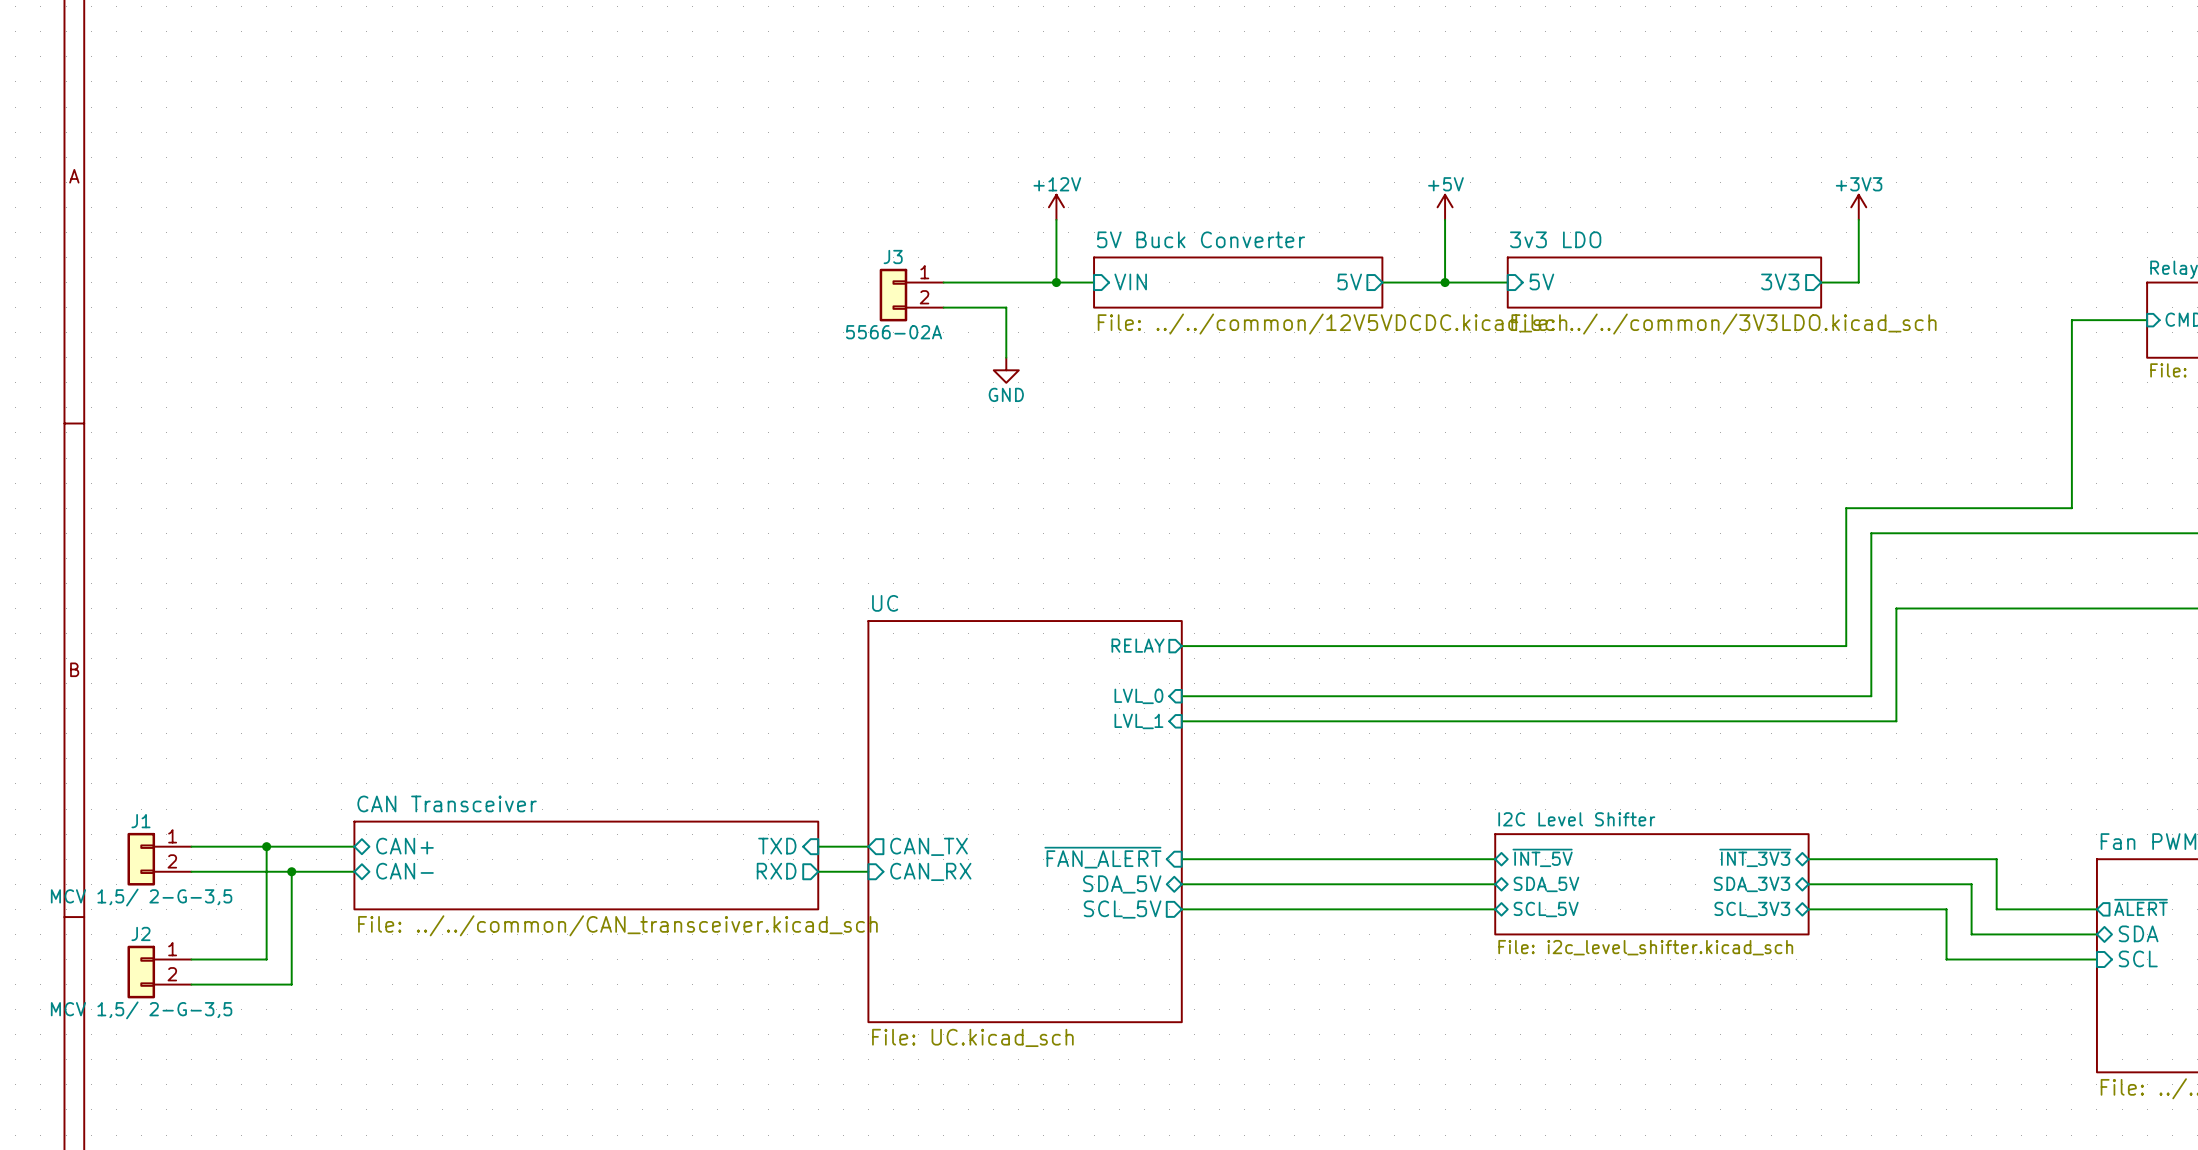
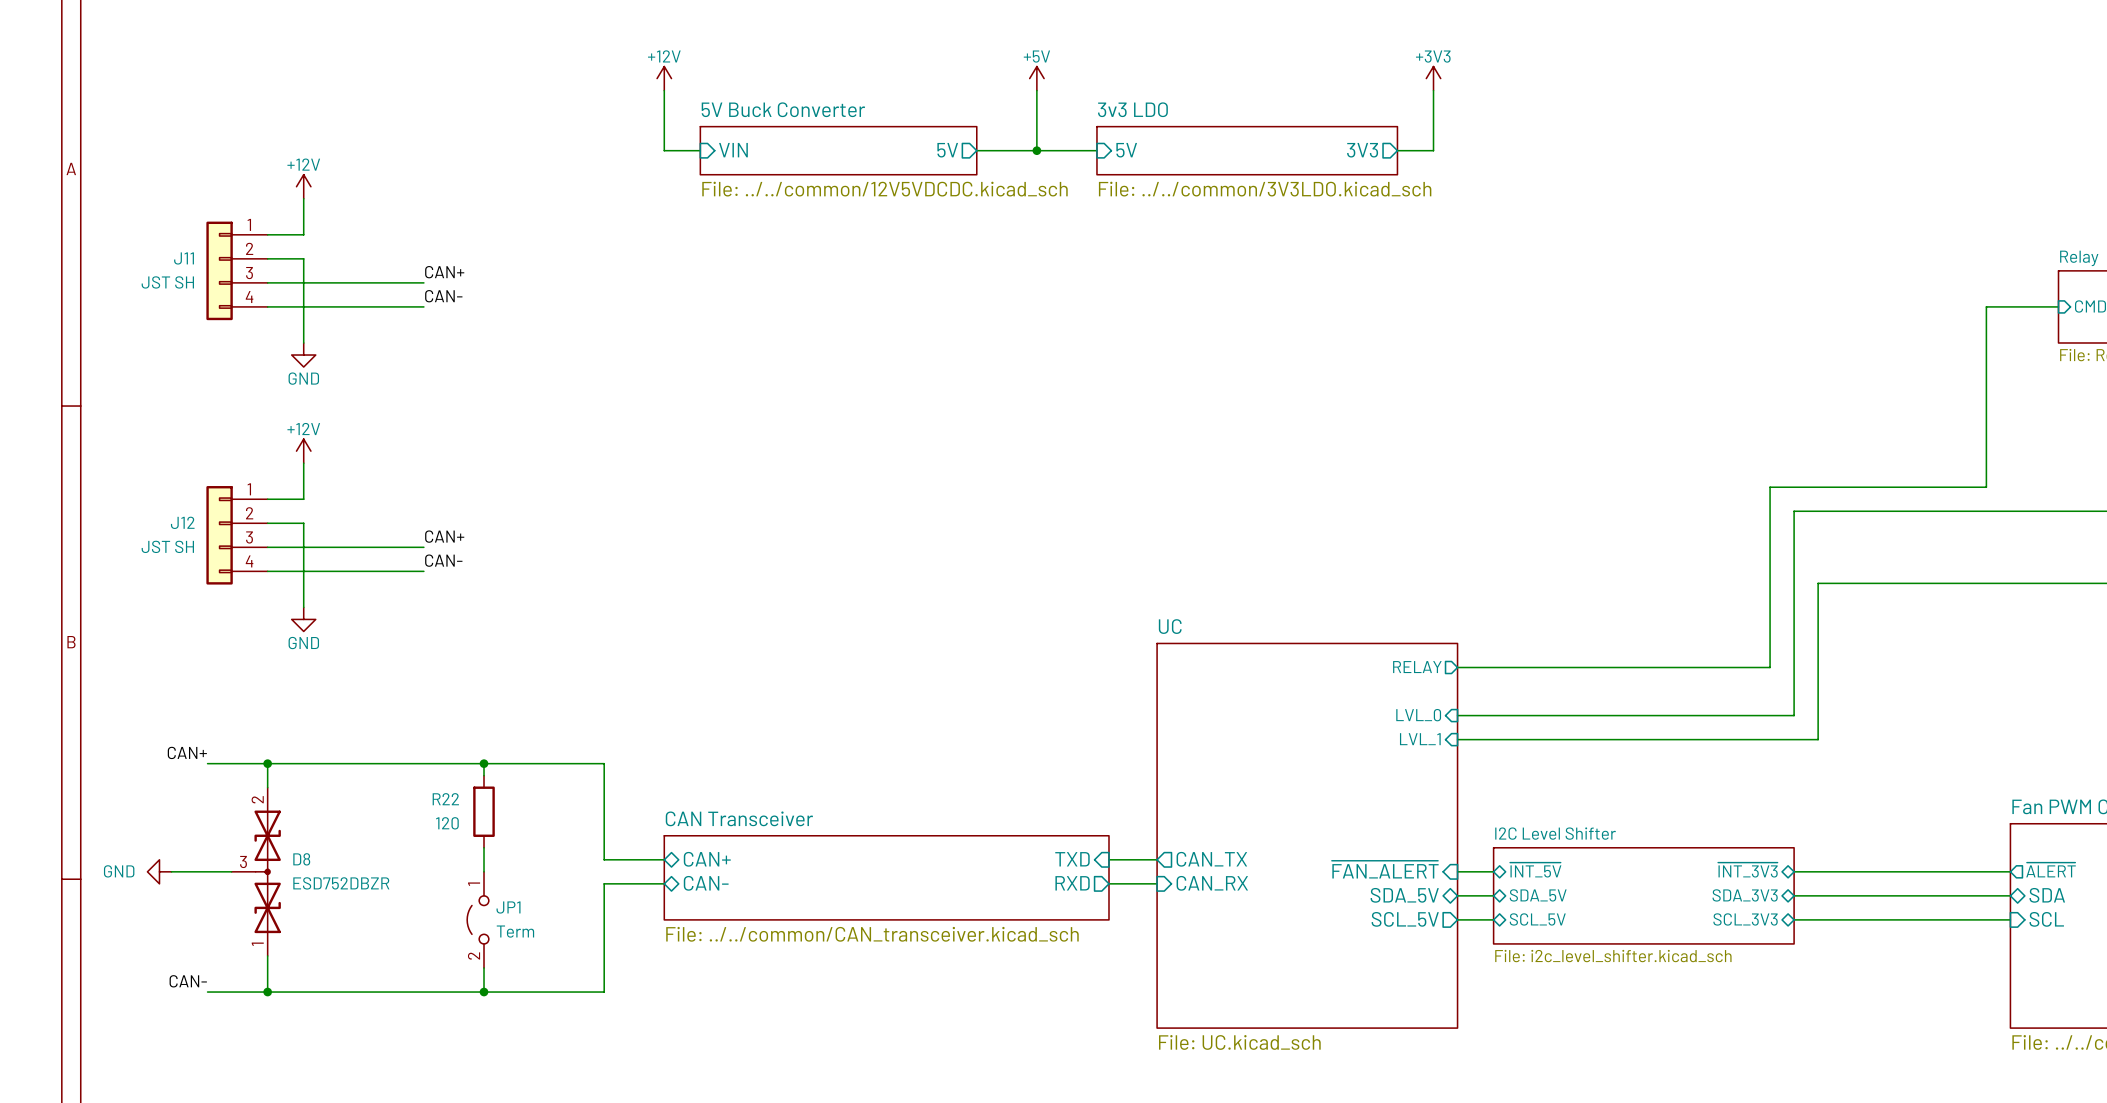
power symbol: none -> +12V (664, 78)
power symbol: none -> +5V (1036, 78)
power symbol: none -> +3V3 (1433, 78)
wire: none -> (664, 90) (664, 150) (700, 150)
wire: none -> (1433, 90) (1433, 150) (1397, 150)
sheet pin: none -> VIN (733, 150)
sheet pin: none -> 5V (947, 150)
sheet pin: none -> 5V (1126, 150)
sheet pin: none -> 3V3 (1362, 150)
wire: none -> (976, 150) (1096, 150)
junction: none -> (1036, 150)
power symbol: none -> +12V (303, 186)
wire: none -> (303, 198) (303, 234) (267, 234)
power symbol: +12V (1056, 207) -> none
power symbol: +5V (1445, 207) -> none
power symbol: +3V3 (1858, 207) -> none
wire: (1056, 219) (1056, 282) -> (1036, 90) (1036, 150)
wire: (1445, 219) (1445, 282) -> none
wire: (1858, 219) (1858, 282) (1821, 282) -> none
wire: none -> (267, 258) (303, 258) (303, 342)
sheet pin: VIN (1130, 281) -> none
sheet pin: 5V (1349, 281) -> none
sheet pin: 5V (1541, 281) -> none
sheet pin: 3V3 (1780, 281) -> none
J11: none -> JST SH (237, 270)
wire: (943, 282) (1094, 282) -> none
junction: (1056, 282) -> none
sheet 5V Buck Converter position: (1238, 282) -> (838, 150)
wire: (1382, 282) (1507, 282) -> none
junction: (1445, 282) -> none
sheet 3v3 LDO position: (1664, 282) -> (1247, 150)
label: none -> CAN+ (444, 272)
wire: none -> (267, 282) (423, 282)
J3: 5566-02A (911, 295) -> none
wire: (943, 307) (1006, 307) (1006, 357) -> none
label: none -> CAN- (443, 296)
wire: none -> (267, 306) (423, 306)
power symbol: none -> GND (303, 355)
power symbol: GND (1006, 370) -> none
power symbol: none -> +12V (303, 451)
wire: none -> (303, 463) (303, 499) (267, 499)
wire: none -> (267, 523) (303, 523) (303, 607)
J12: none -> JST SH (237, 535)
label: none -> CAN+ (444, 536)
wire: none -> (267, 547) (423, 547)
label: none -> CAN- (443, 560)
wire: none -> (267, 571) (423, 571)
sheet pin: RELAY (1138, 645) -> none
power symbol: none -> GND (303, 619)
wire: (1181, 646) (1846, 646) -> none
sheet pin: none -> RELAY (1417, 667)
sheet pin: LVL_0 (1138, 696) -> none
wire: (1181, 696) (1520, 696) -> none
wire: (1846, 696) (1871, 696) -> (1770, 667) (1770, 619)
wire: none -> (1794, 667) (1794, 715) (1457, 715)
sheet pin: LVL_1 (1138, 721) -> none
wire: (1181, 721) (1896, 721) -> (1457, 739) (1818, 739) (1818, 691)
sheet pin: none -> LVL_0 (1418, 715)
sheet pin: none -> LVL_1 (1420, 739)
label: none -> CAN+ (187, 752)
wire: none -> (207, 763) (604, 763) (604, 859) (664, 859)
wire: none -> (267, 763) (267, 787)
junction: none -> (267, 763)
junction: none -> (484, 763)
sheet UC: File: UC.kicad_sch (1025, 821) -> none
wire: (191, 846) (354, 846) -> none
wire: (266, 846) (266, 959) (191, 959) -> none
junction: (266, 846) -> none
sheet pin: CAN+ (404, 846) -> none
R22: none -> 120 (484, 811)
sheet pin: TXD (777, 846) -> none
wire: (818, 846) (868, 846) -> none
sheet pin: CAN_TX (929, 846) -> none
sheet pin: ~{FAN_ALERT} (1102, 857) -> none
sheet pin position: ~{INT_5V} (1542, 857) -> ~{INT_5V} (1535, 870)
sheet pin position: ~{INT_3V3} (1755, 857) -> ~{INT_3V3} (1747, 870)
J1: MCV 1,5/ 2-G-3,5 (159, 859) -> none
wire: (1181, 859) (1495, 859) -> none
wire: (1808, 859) (1996, 859) (1996, 909) -> none
sheet CAN Transceiver: File: ../../common/CAN_transceiver.kicad_sch (586, 865) -> none
wire: (191, 871) (354, 871) -> none
wire: (291, 871) (291, 984) (191, 984) -> none
junction: (291, 871) -> none
sheet pin: CAN- (404, 871) -> none
sheet pin: RXD (776, 871) -> none
sheet pin: CAN_RX (930, 871) -> none
sheet UC: none -> File: UC.kicad_sch (1307, 835)
wire: none -> (484, 847) (484, 871)
sheet pin: SDA_5V (1122, 884) -> none
wire: (1181, 884) (1495, 884) -> none
sheet pin: SDA_5V (1546, 884) -> none
sheet I2C Level Shifter position: (1651, 884) -> (1643, 895)
sheet pin position: SDA_3V3 (1752, 884) -> SDA_3V3 (1745, 895)
wire: (1808, 884) (1971, 884) (1971, 934) -> (1794, 895) (1890, 895)
sheet pin: none -> CAN+ (707, 859)
sheet pin: none -> TXD (1072, 859)
wire: none -> (1108, 859) (1157, 859)
sheet pin: none -> CAN_TX (1211, 859)
power symbol: none -> GND (159, 871)
wire: none -> (171, 871) (231, 871)
D8: none -> ESD752DBZR (256, 871)
sheet pin: SCL_5V (1122, 909) -> none
wire: (1181, 909) (1495, 909) -> none
wire: none -> (1457, 871) (1493, 871)
sheet pin shape: bidirectional (1546, 909) -> input (1385, 869)
sheet pin: SCL_5V (1546, 909) -> ~{FAN_ALERT} (1385, 869)
sheet pin position: SCL_3V3 (1752, 909) -> SCL_3V3 (1745, 919)
wire: (1808, 909) (1871, 909) -> none
wire: (1946, 909) (1946, 959) -> (1866, 871) (1914, 871)
sheet CAN Transceiver: none -> File: ../../common/CAN_transceiver.kicad_sch (886, 877)
wire: none -> (664, 883) (604, 883) (604, 992) (207, 992)
sheet pin: none -> CAN- (706, 883)
sheet pin: none -> RXD (1072, 883)
wire: none -> (1108, 883) (1157, 883)
sheet pin: none -> CAN_RX (1212, 883)
sheet pin: none -> SDA_5V (1404, 895)
sheet pin: none -> SDA_5V (1538, 895)
JP1: none -> Term (477, 919)
sheet pin: none -> SCL_5V (1405, 919)
wire: none -> (1457, 919) (1493, 919)
sheet pin: none -> SCL_5V (1537, 919)
wire: none -> (1794, 919) (1866, 919)
J2: MCV 1,5/ 2-G-3,5 (159, 972) -> none
wire: none -> (267, 955) (267, 992)
wire: none -> (484, 967) (484, 992)
label: none -> CAN- (188, 981)
junction: none -> (267, 992)
junction: none -> (484, 992)

